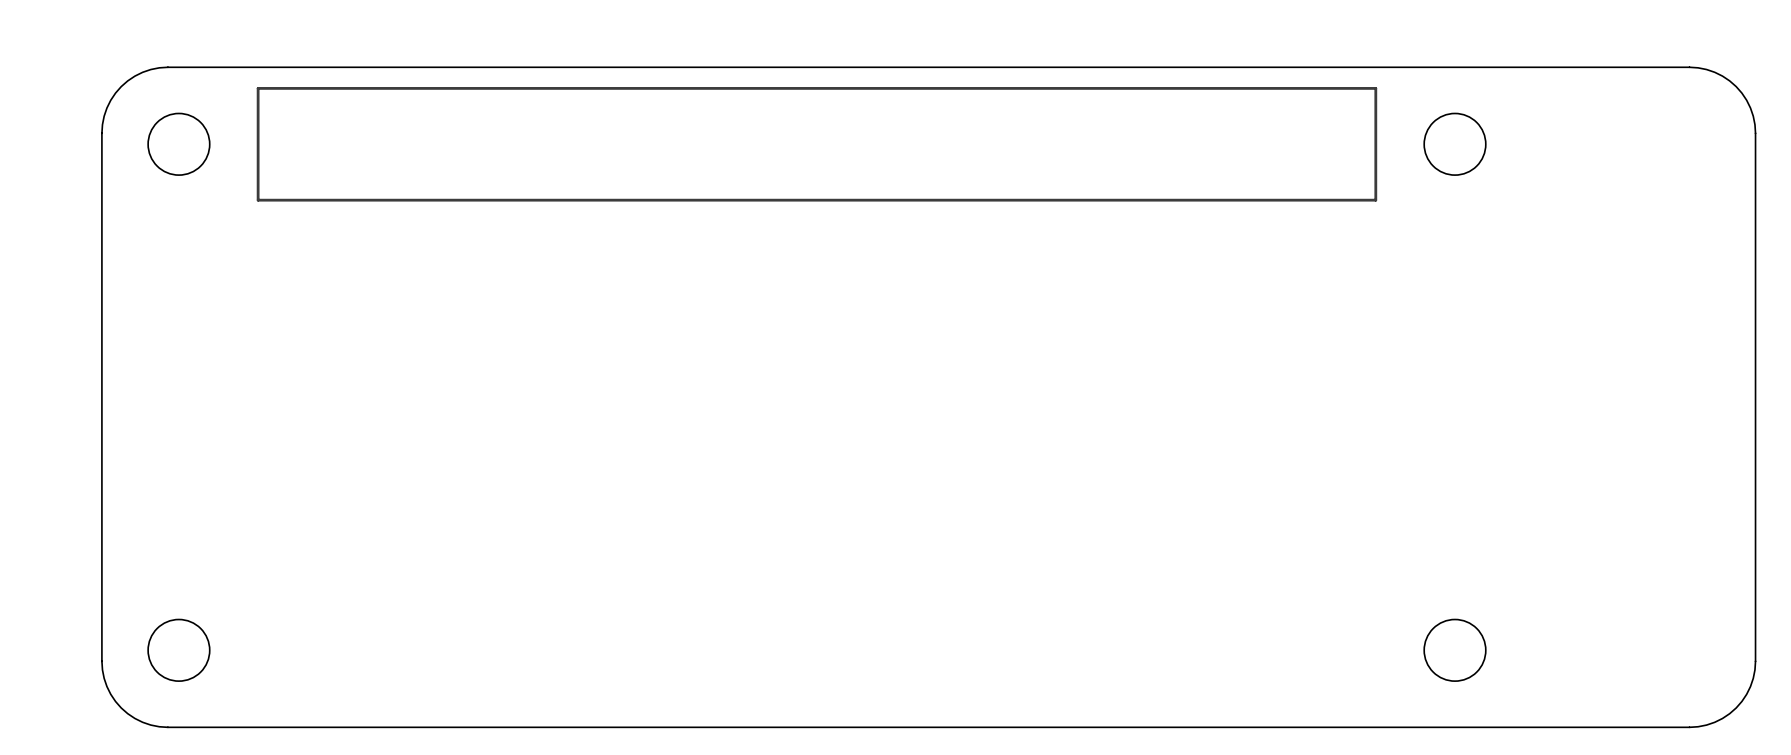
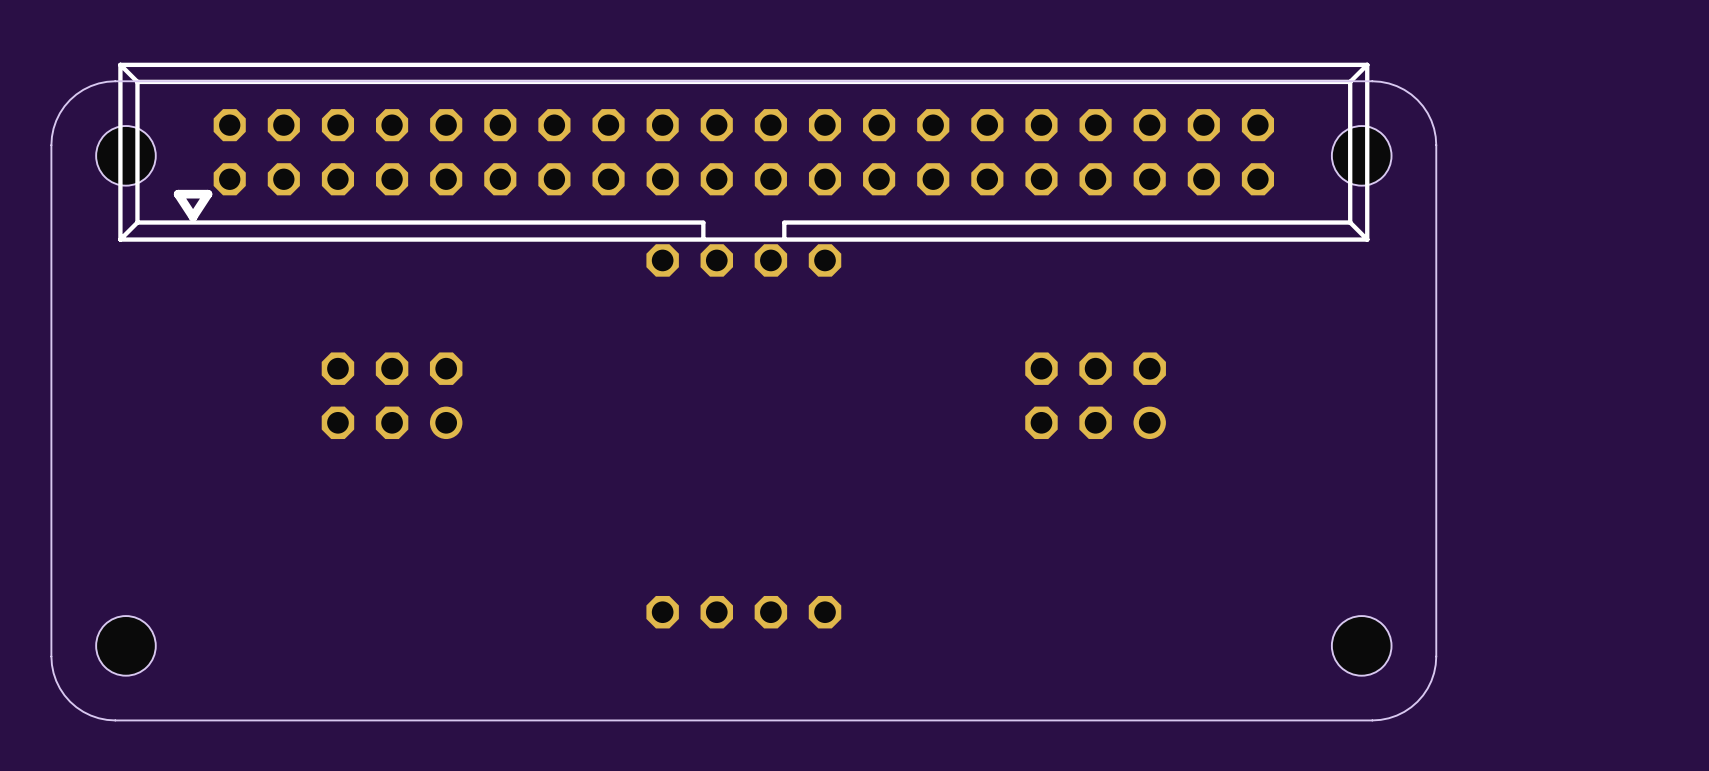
board edge: (1465, 67) (1689, 67) (1706, 69) (1729, 80) (1741, 93) (1753, 116) (1755, 133) (1755, 661) (1750, 686) (1741, 701) (1729, 713) (1714, 722) (1698, 726) (1465, 727) -> (1372, 81) (1396, 86) (1417, 99) (1431, 120) (1436, 145) (1435, 664) (1427, 688) (1411, 707) (1388, 718) (1372, 720)
line: (1375, 88) (1375, 200) (258, 200) (258, 88) (1375, 88) -> none
part: none -> (743, 152)
part: none -> (689, 260)
part: none -> (797, 260)
part: none -> (392, 395)
part: none -> (1095, 395)
part: none -> (689, 612)
part: none -> (797, 612)

